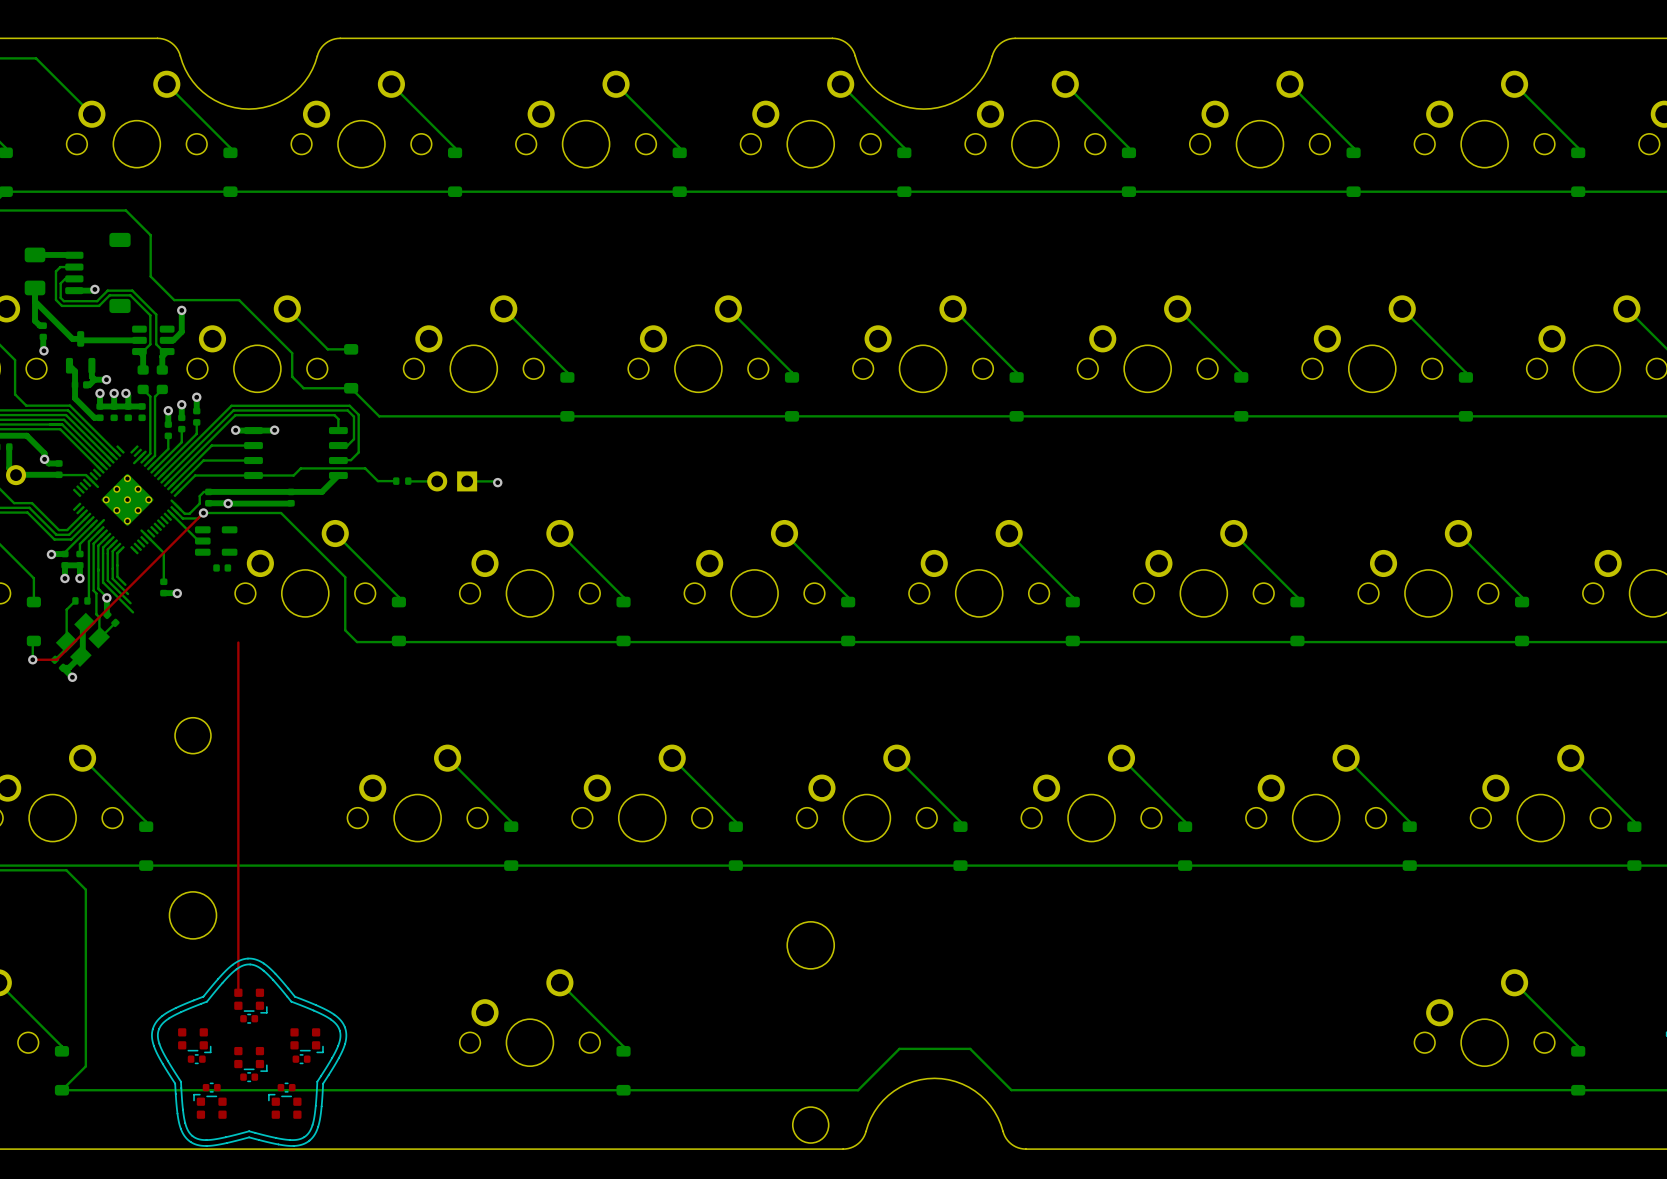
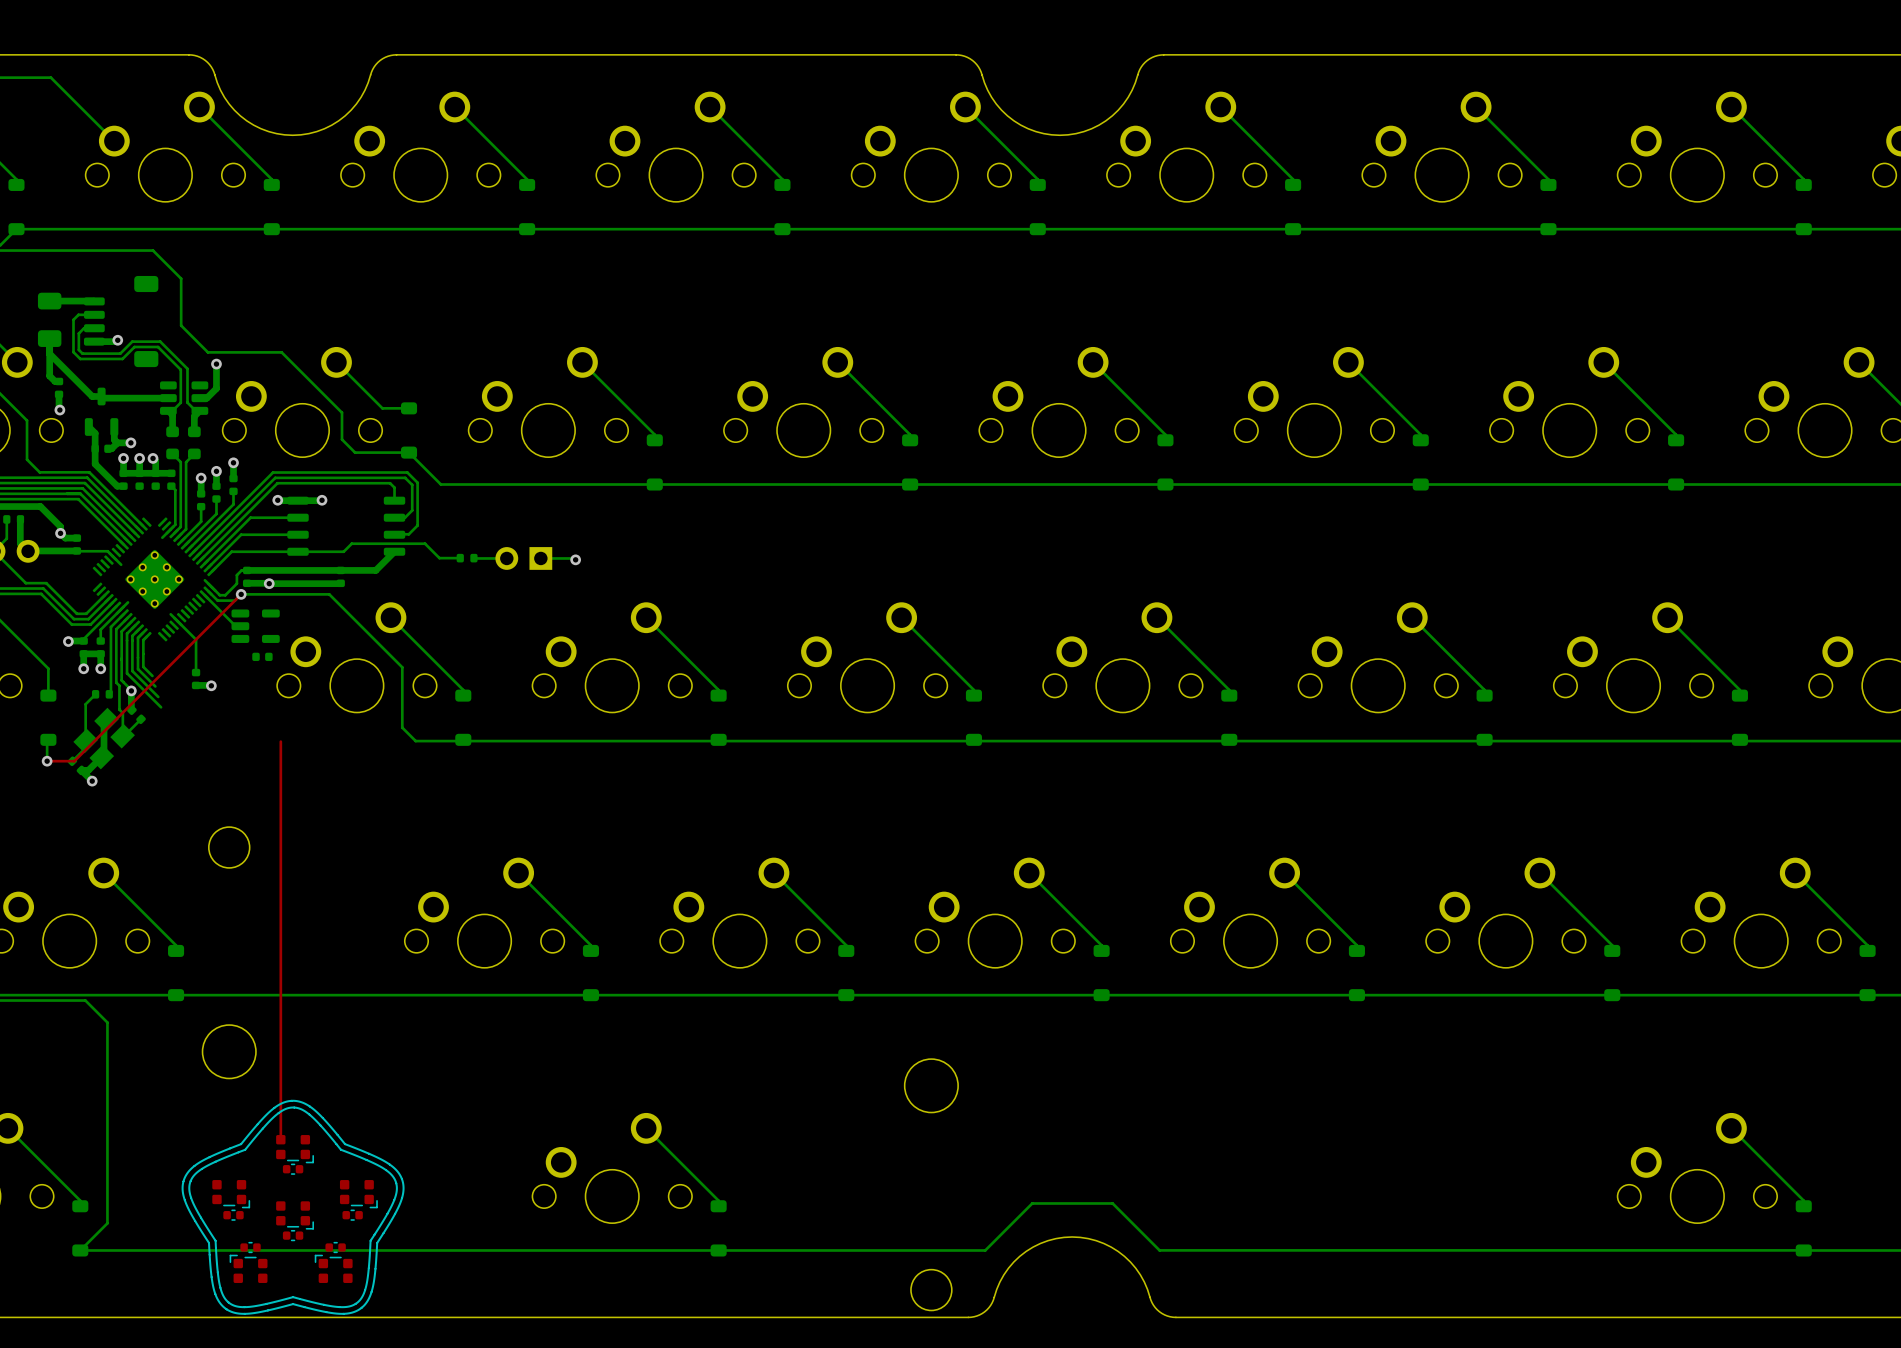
bottom track: none -> (171, 486) (175, 490) (175, 524)

